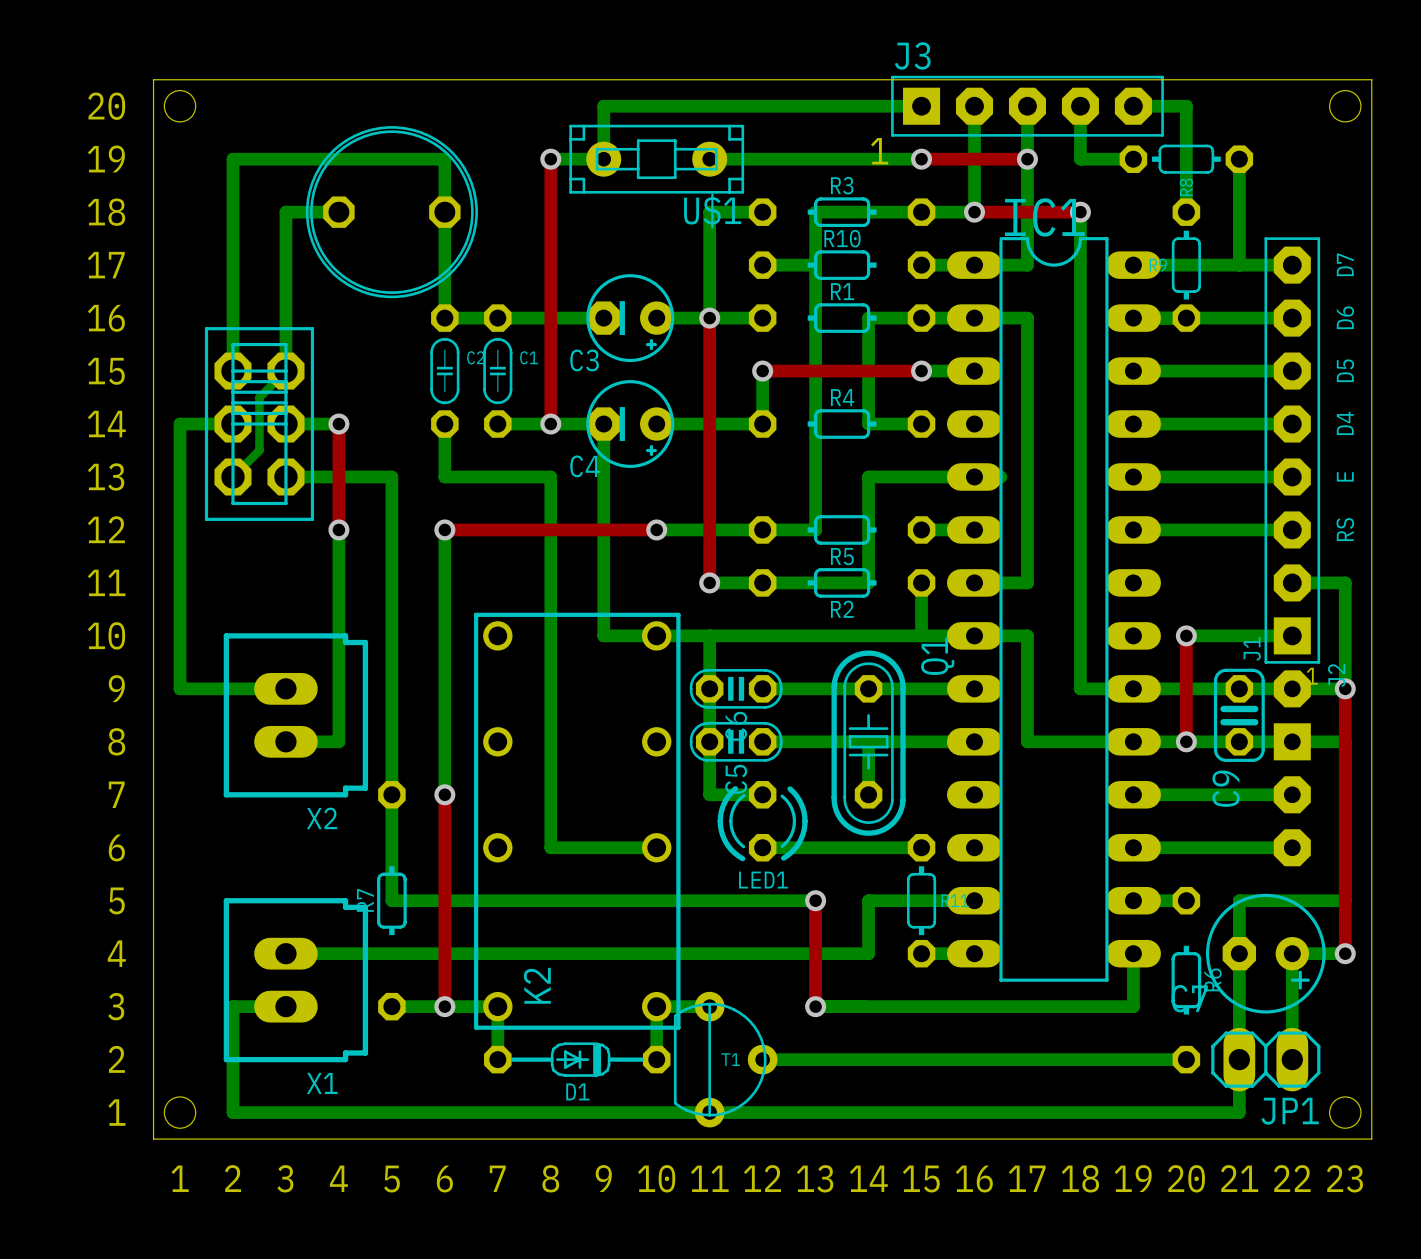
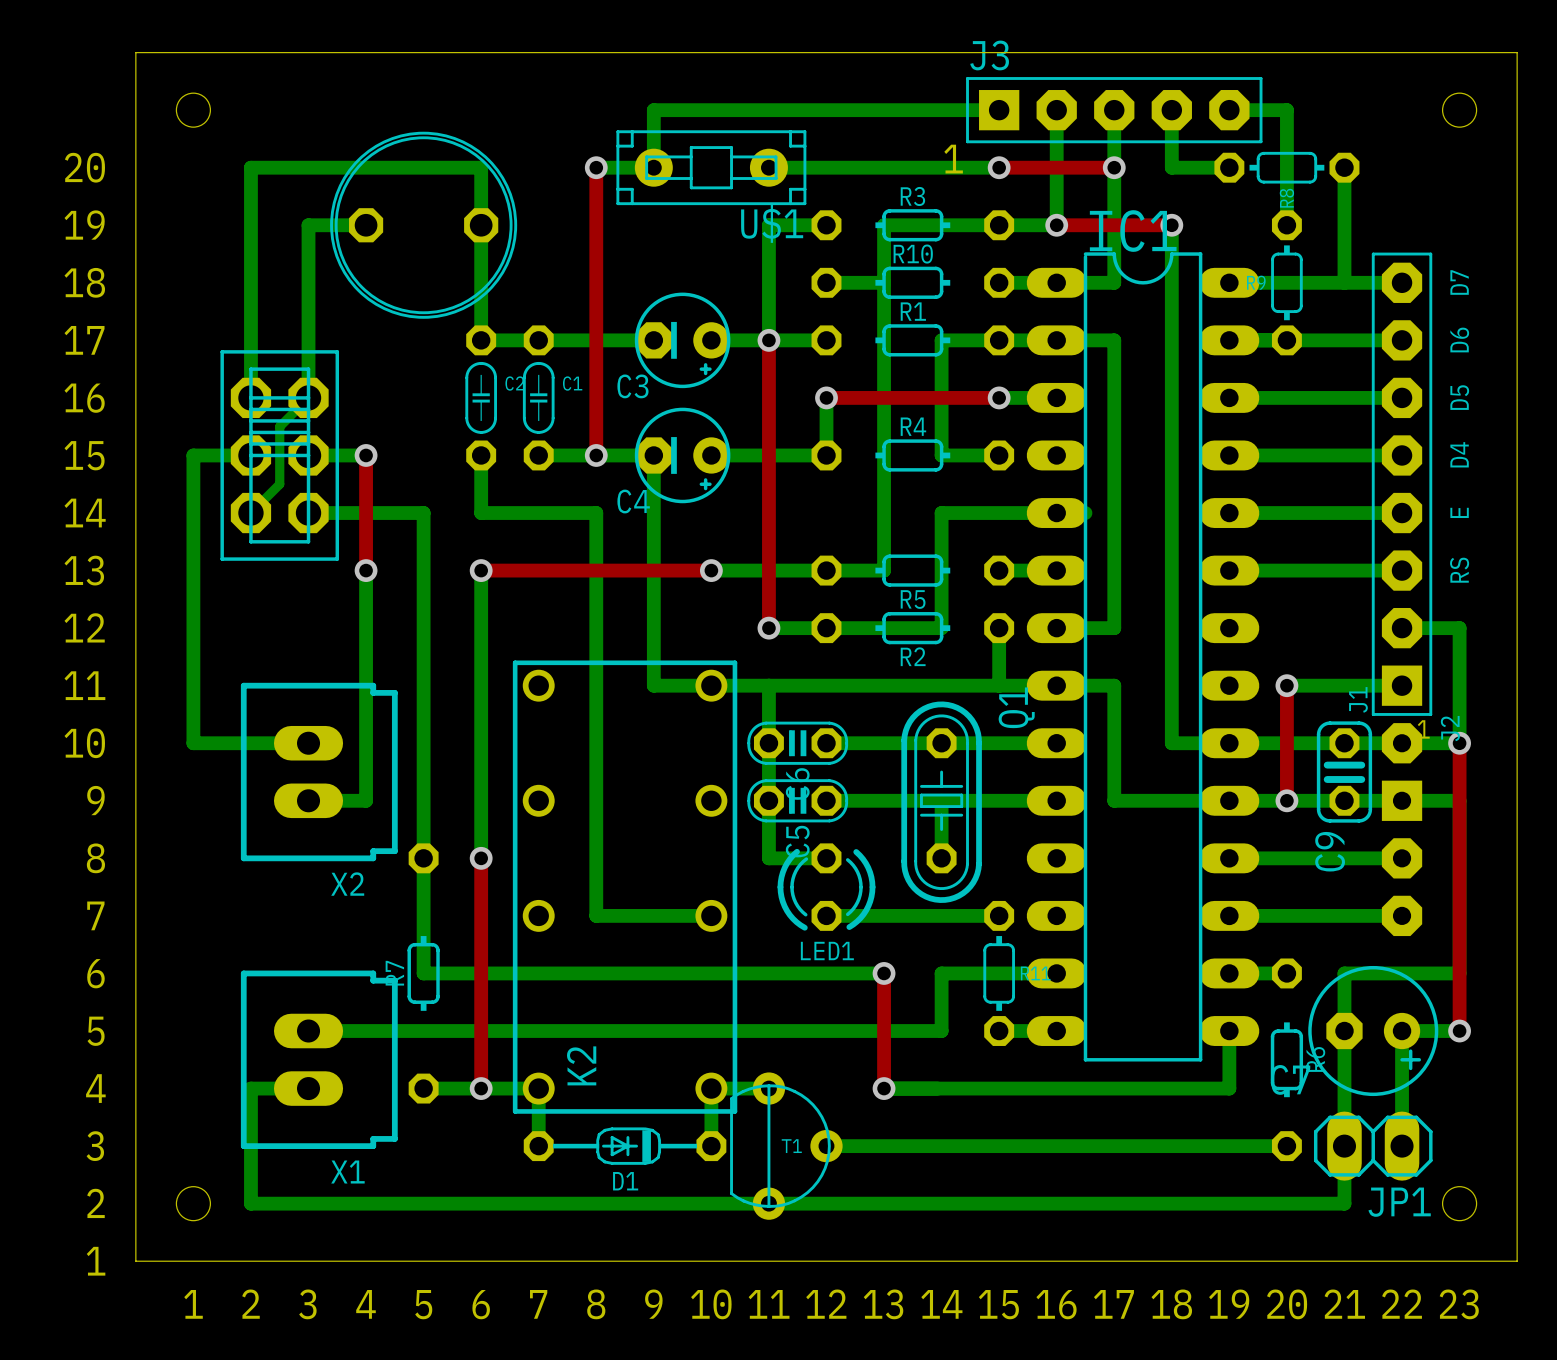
board edge: (153, 79) (1371, 79) (1371, 1139) (153, 1139) (153, 79) -> (135, 52) (135, 1261) (1517, 1261) (1517, 52) (135, 52)
text position: 20 (106, 106) -> 20 (84, 167)
text position: 19 (106, 158) -> 19 (84, 225)
text position: 18 (106, 212) -> 18 (84, 282)
text position: 17 (106, 265) -> 17 (84, 340)
text position: 16 (106, 318) -> 16 (84, 398)
text position: 15 (106, 371) -> 15 (84, 455)
text position: 14 (106, 424) -> 14 (85, 513)
text position: 13 (106, 476) -> 13 (84, 570)
text position: 12 (106, 529) -> 12 (84, 627)
text position: 11 (106, 582) -> 11 (84, 685)
text position: 10 (106, 635) -> 10 (84, 743)
text position: 9 (116, 688) -> 9 (95, 800)
text position: 8 (116, 741) -> 8 (95, 858)
text position: 7 (116, 794) -> 7 (95, 915)
text position: 6 (116, 847) -> 6 (95, 973)
text position: 5 (116, 900) -> 5 (96, 1031)
text position: 4 (116, 953) -> 4 (95, 1088)
text position: 3 (116, 1006) -> 3 (95, 1146)
text position: 2 (116, 1059) -> 2 (95, 1203)
text position: 1 (116, 1112) -> 1 (96, 1261)
text position: 1 (180, 1178) -> 1 (193, 1304)
text position: 2 (233, 1178) -> 2 (251, 1304)
text position: 3 (285, 1178) -> 3 (307, 1304)
text position: 4 (338, 1178) -> 4 (365, 1304)
text position: 7 (497, 1178) -> 7 (538, 1304)
text position: 8 (550, 1178) -> 8 (596, 1304)
text position: 9 (603, 1178) -> 9 (653, 1304)
text position: 10 (656, 1178) -> 10 (711, 1304)
text position: 11 (709, 1178) -> 11 (769, 1304)
text position: 12 (762, 1178) -> 12 (826, 1304)
text position: 13 (815, 1178) -> 13 (883, 1304)
text position: 14 (868, 1178) -> 14 (941, 1304)
text position: 17 (1027, 1178) -> 17 (1113, 1304)
text position: 18 (1080, 1178) -> 18 (1171, 1304)
text position: 19 (1133, 1178) -> 19 (1229, 1304)
text position: 20 (1186, 1178) -> 20 (1287, 1304)
text position: 21 (1239, 1178) -> 21 (1344, 1304)
text position: 22 (1292, 1178) -> 22 (1402, 1304)
text position: 23 (1344, 1178) -> 23 (1459, 1304)
text position: 5 (391, 1179) -> 5 (423, 1304)
text position: 6 (444, 1179) -> 6 (481, 1304)
text position: 15 (921, 1179) -> 15 (998, 1304)
text position: 16 (974, 1179) -> 16 (1056, 1304)

